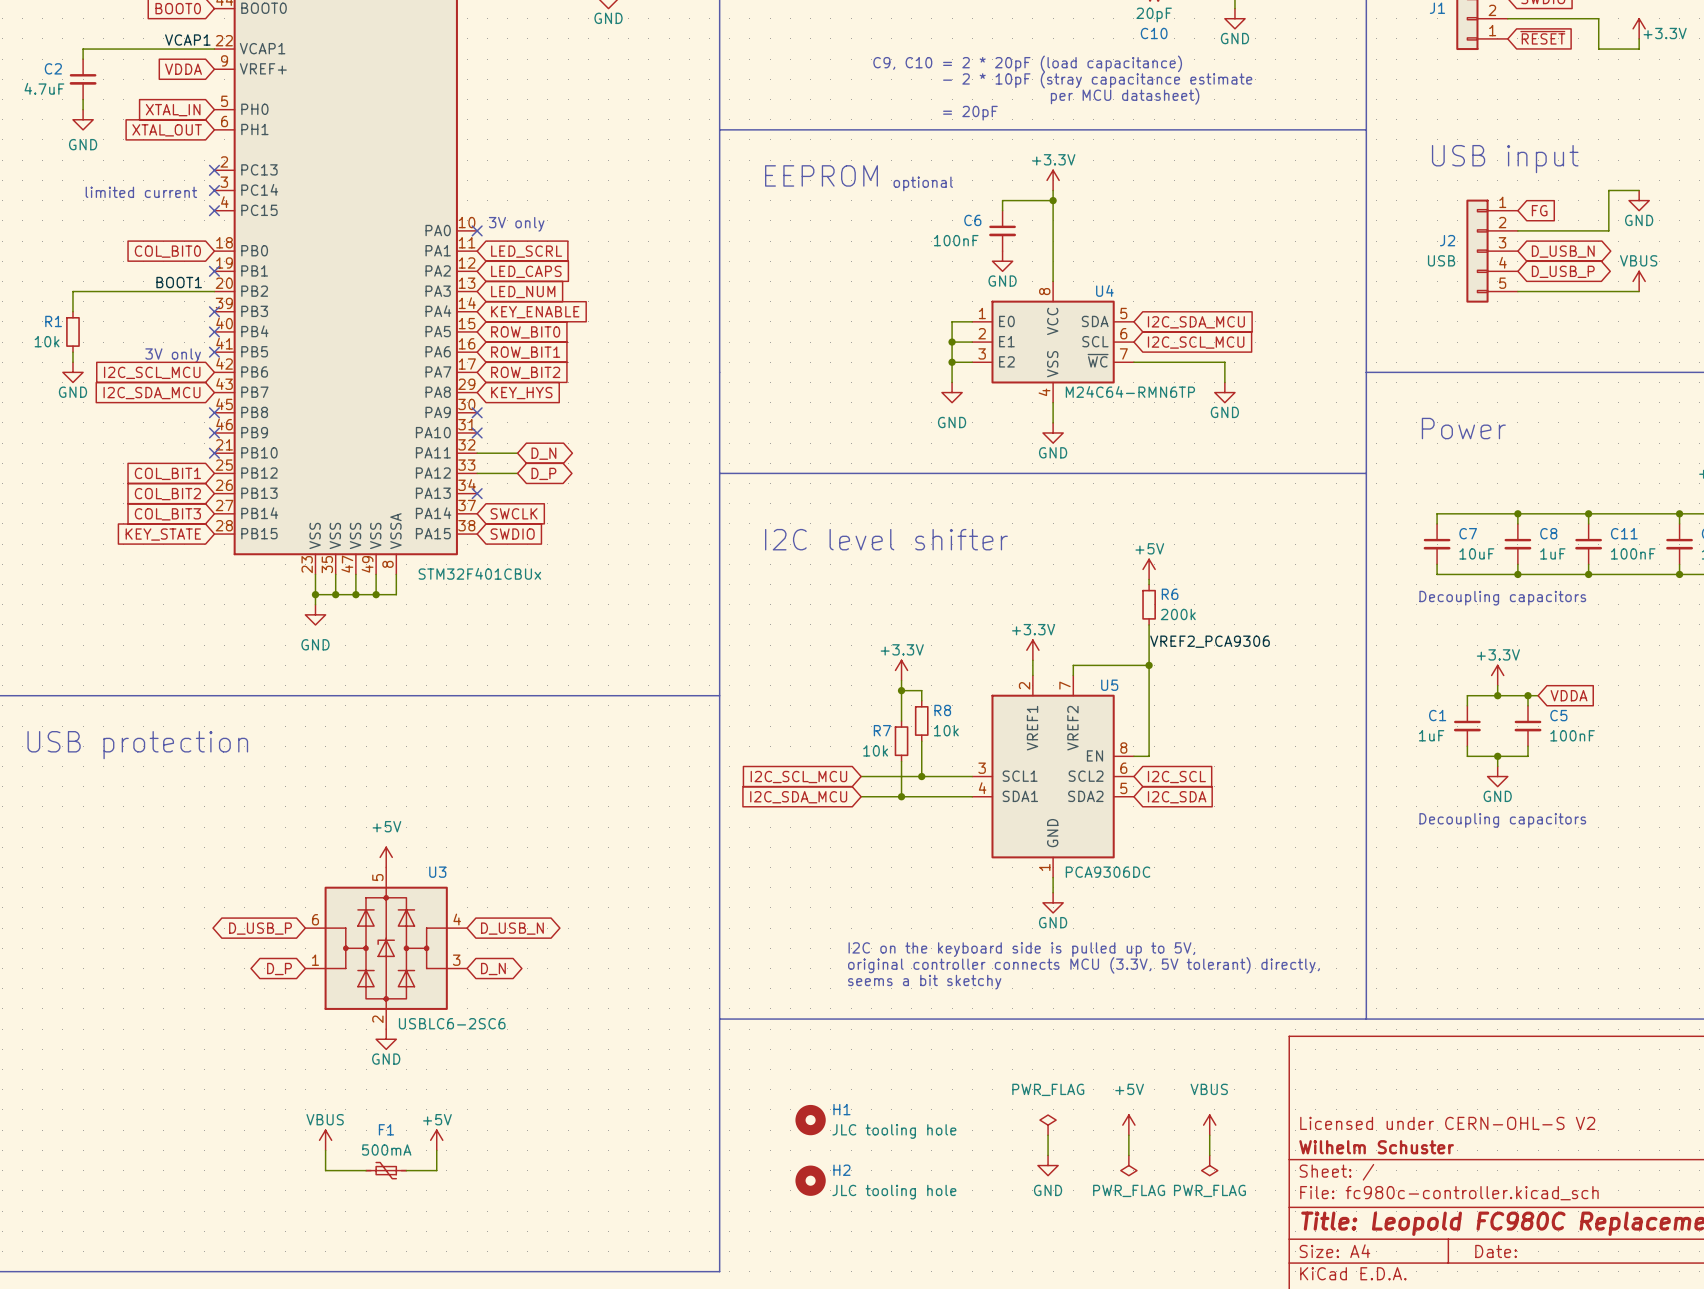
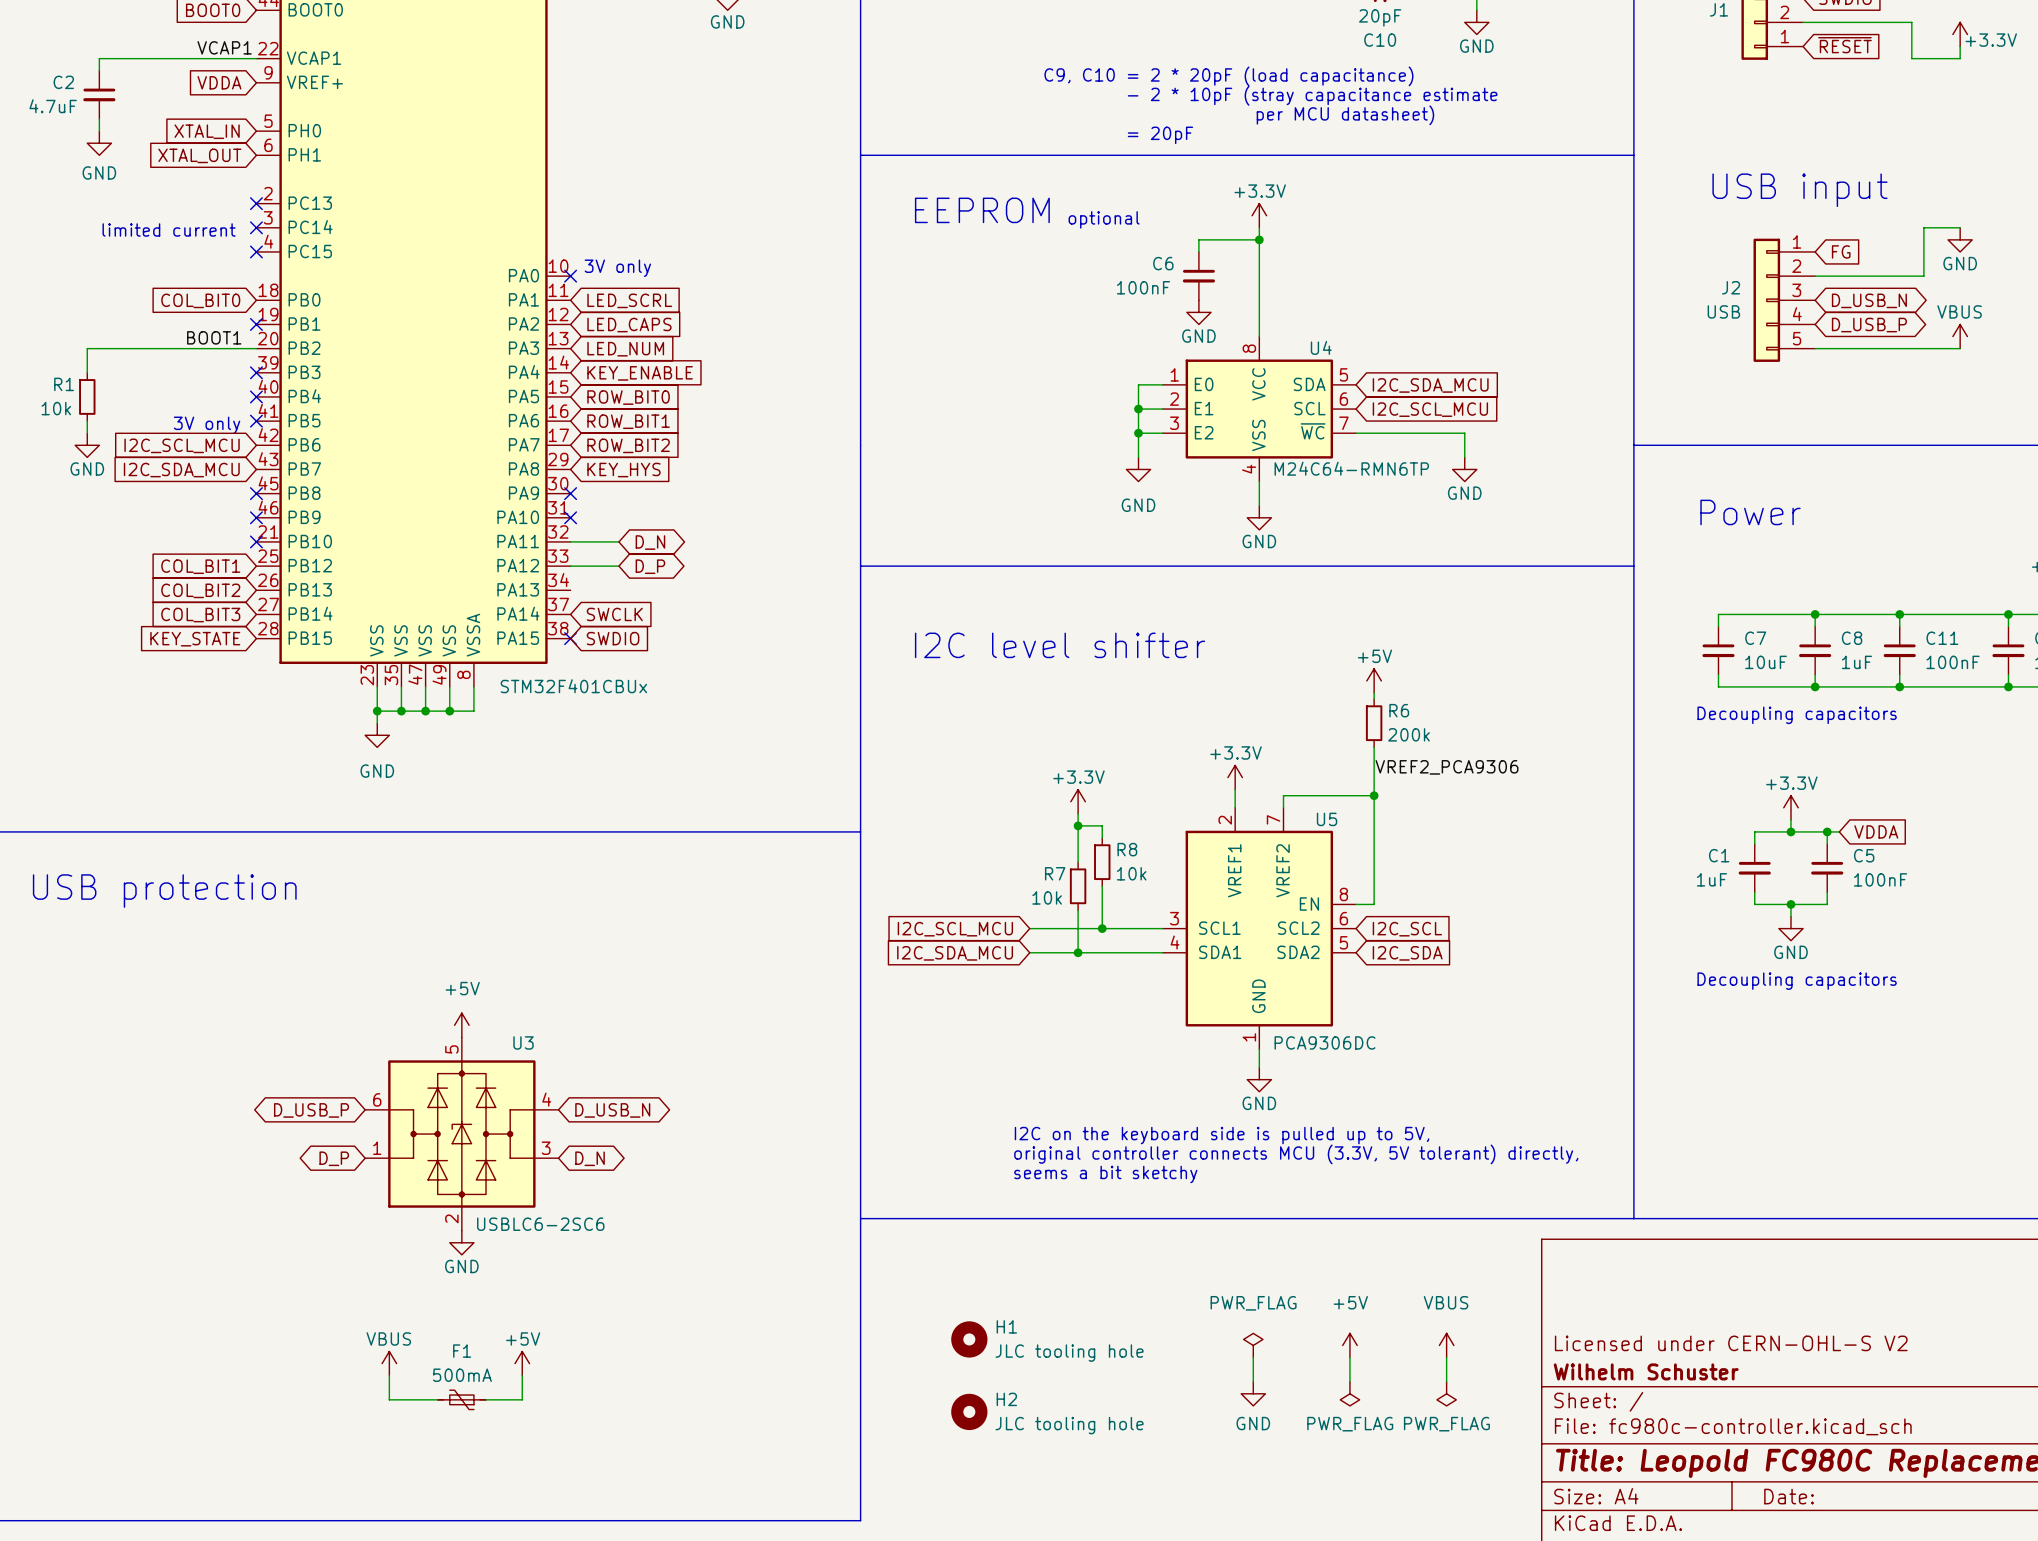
no-connect mark position: (477, 493) -> (570, 638)

